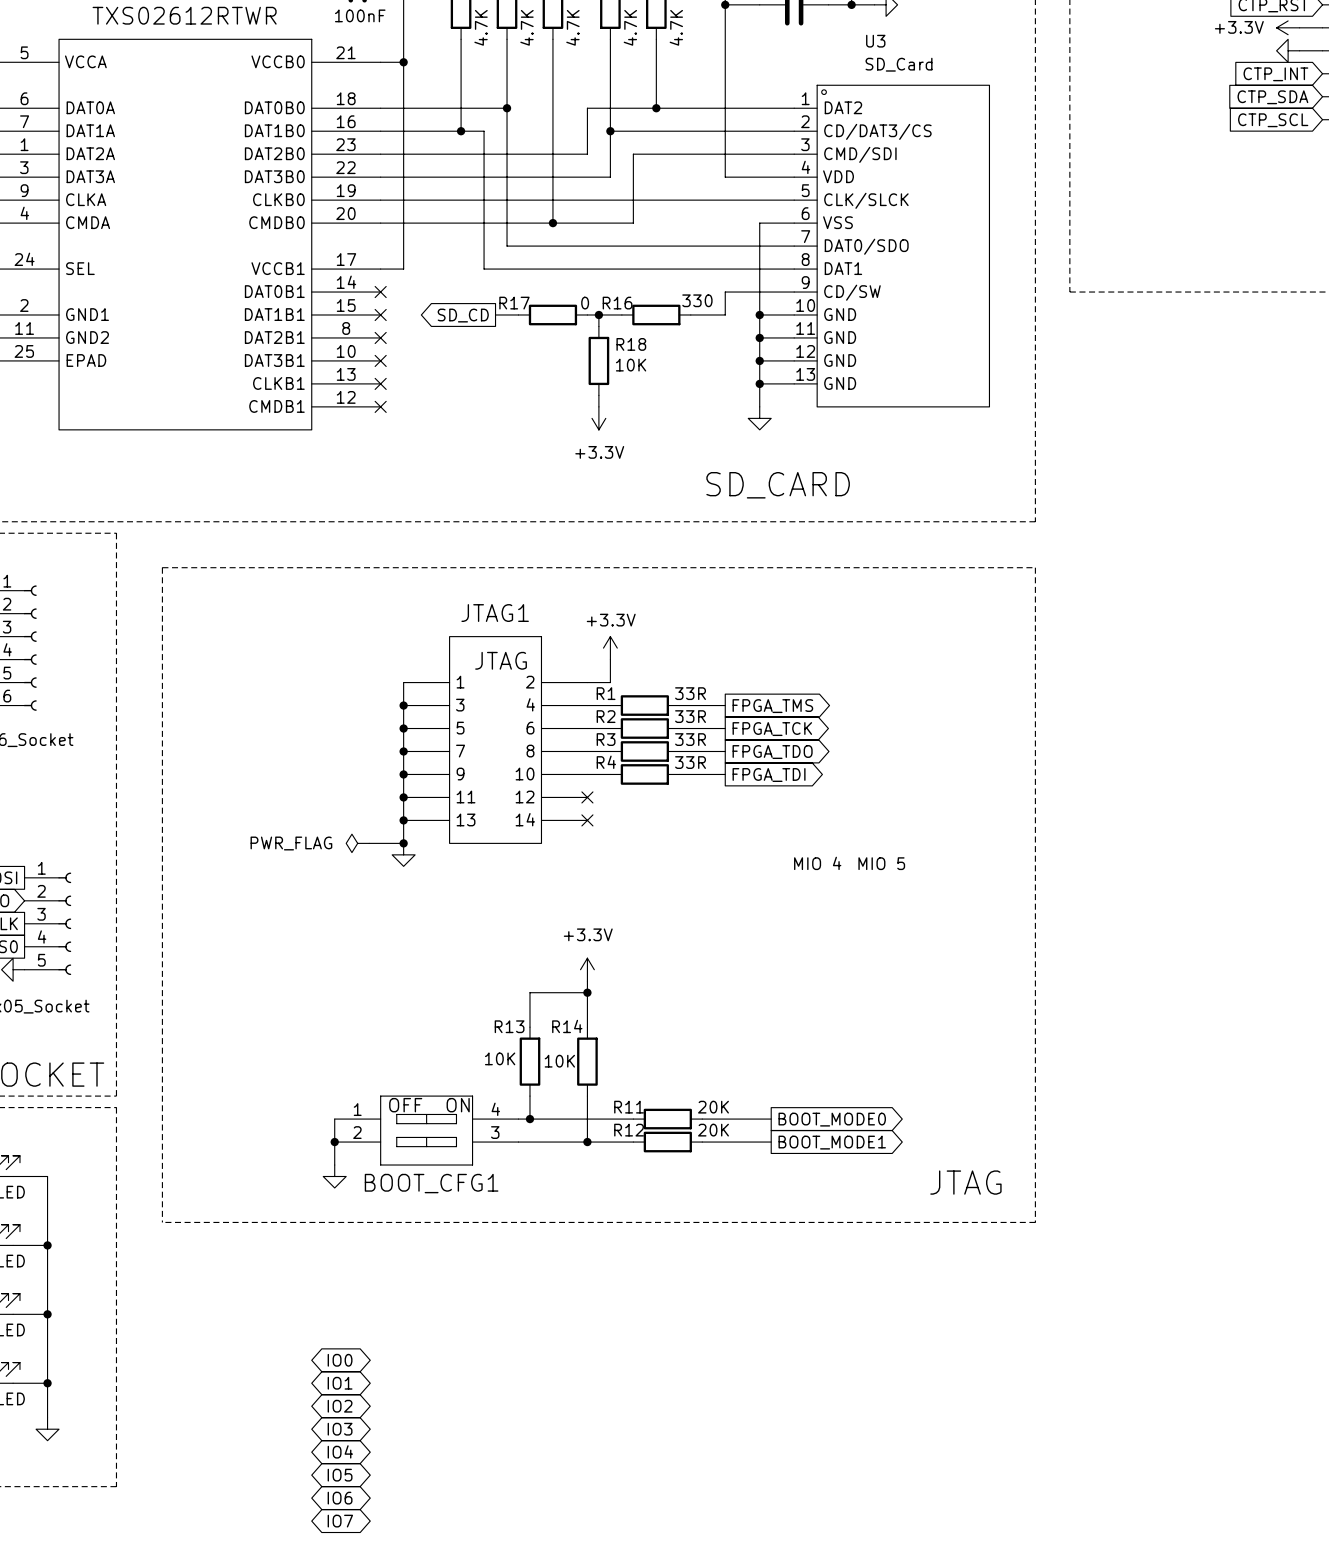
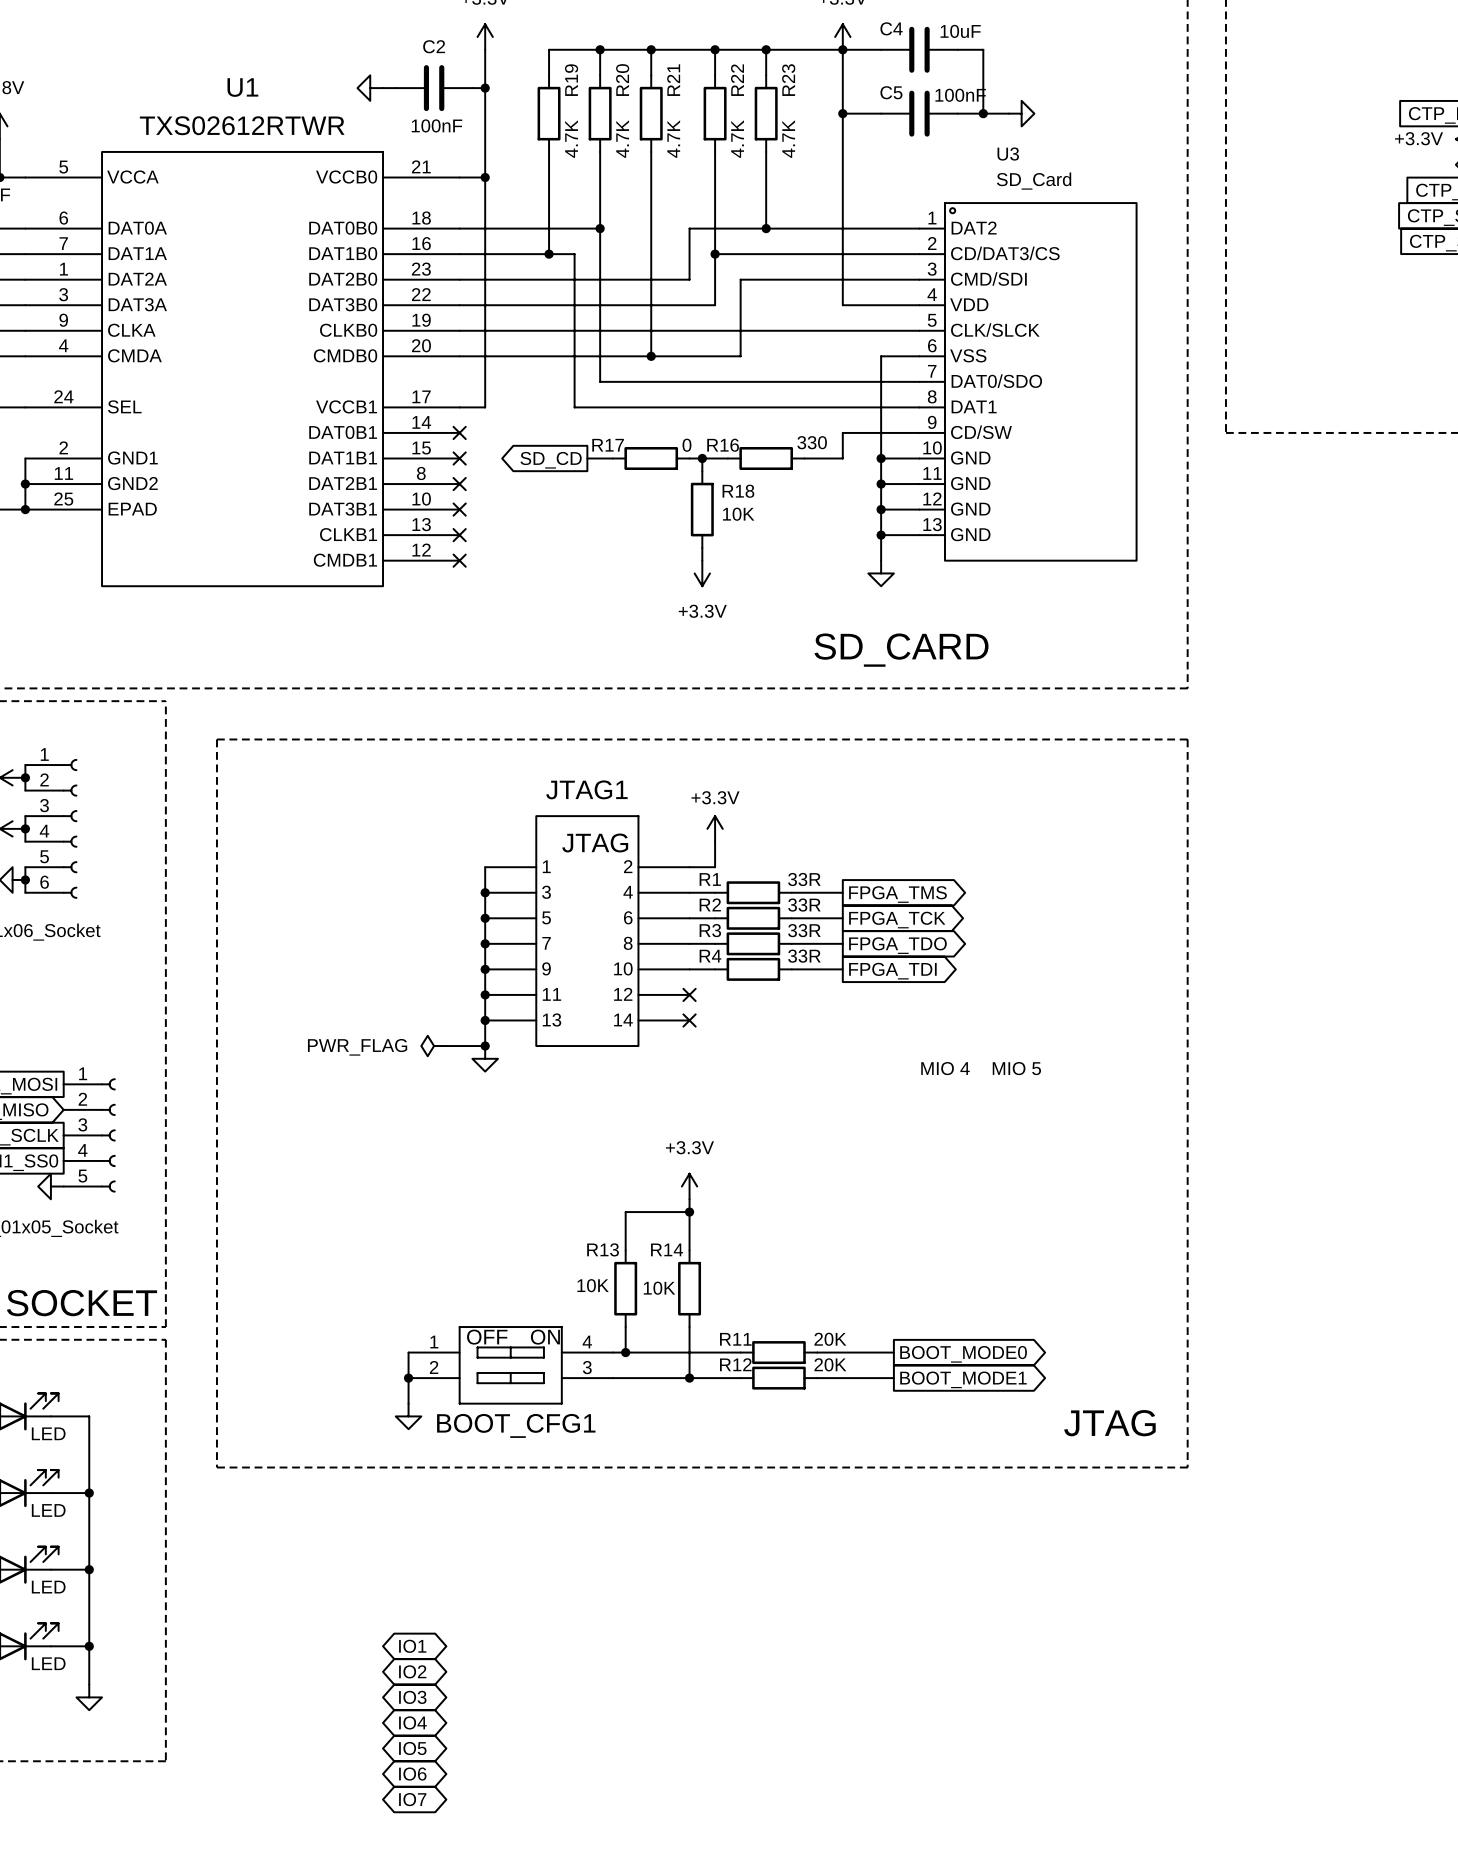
global label: IO0 (340, 1360) -> none

